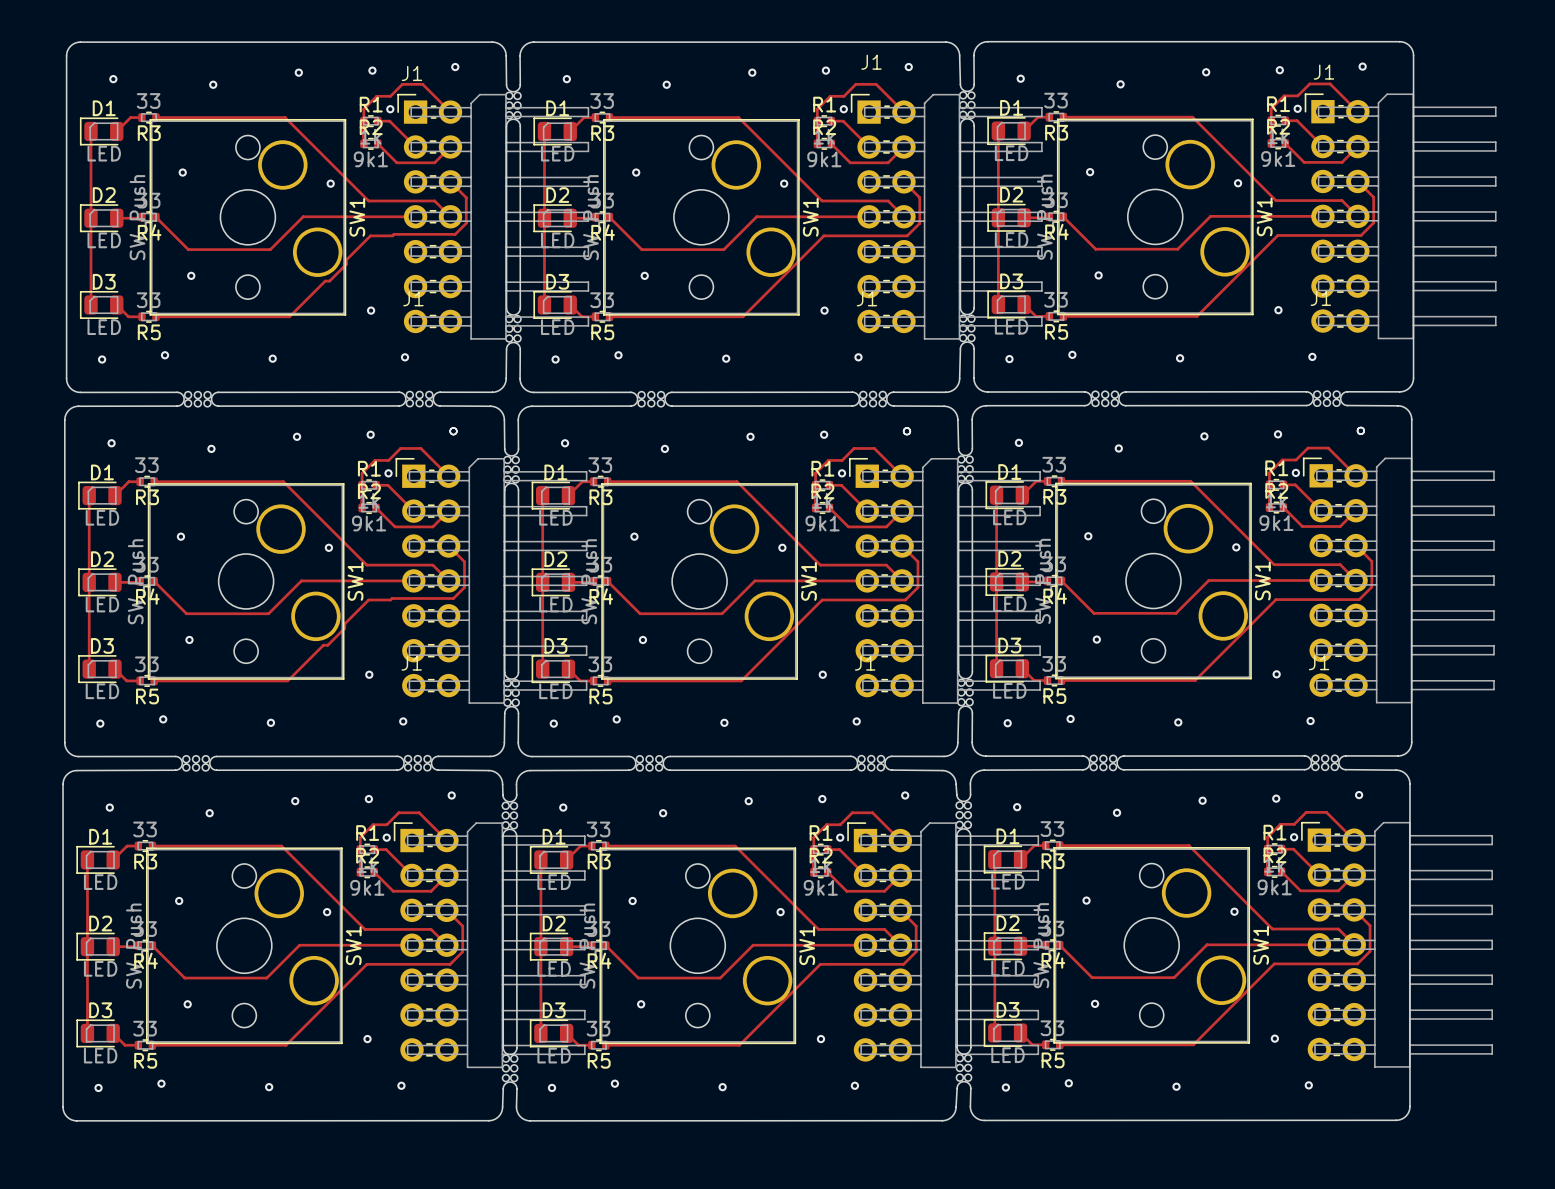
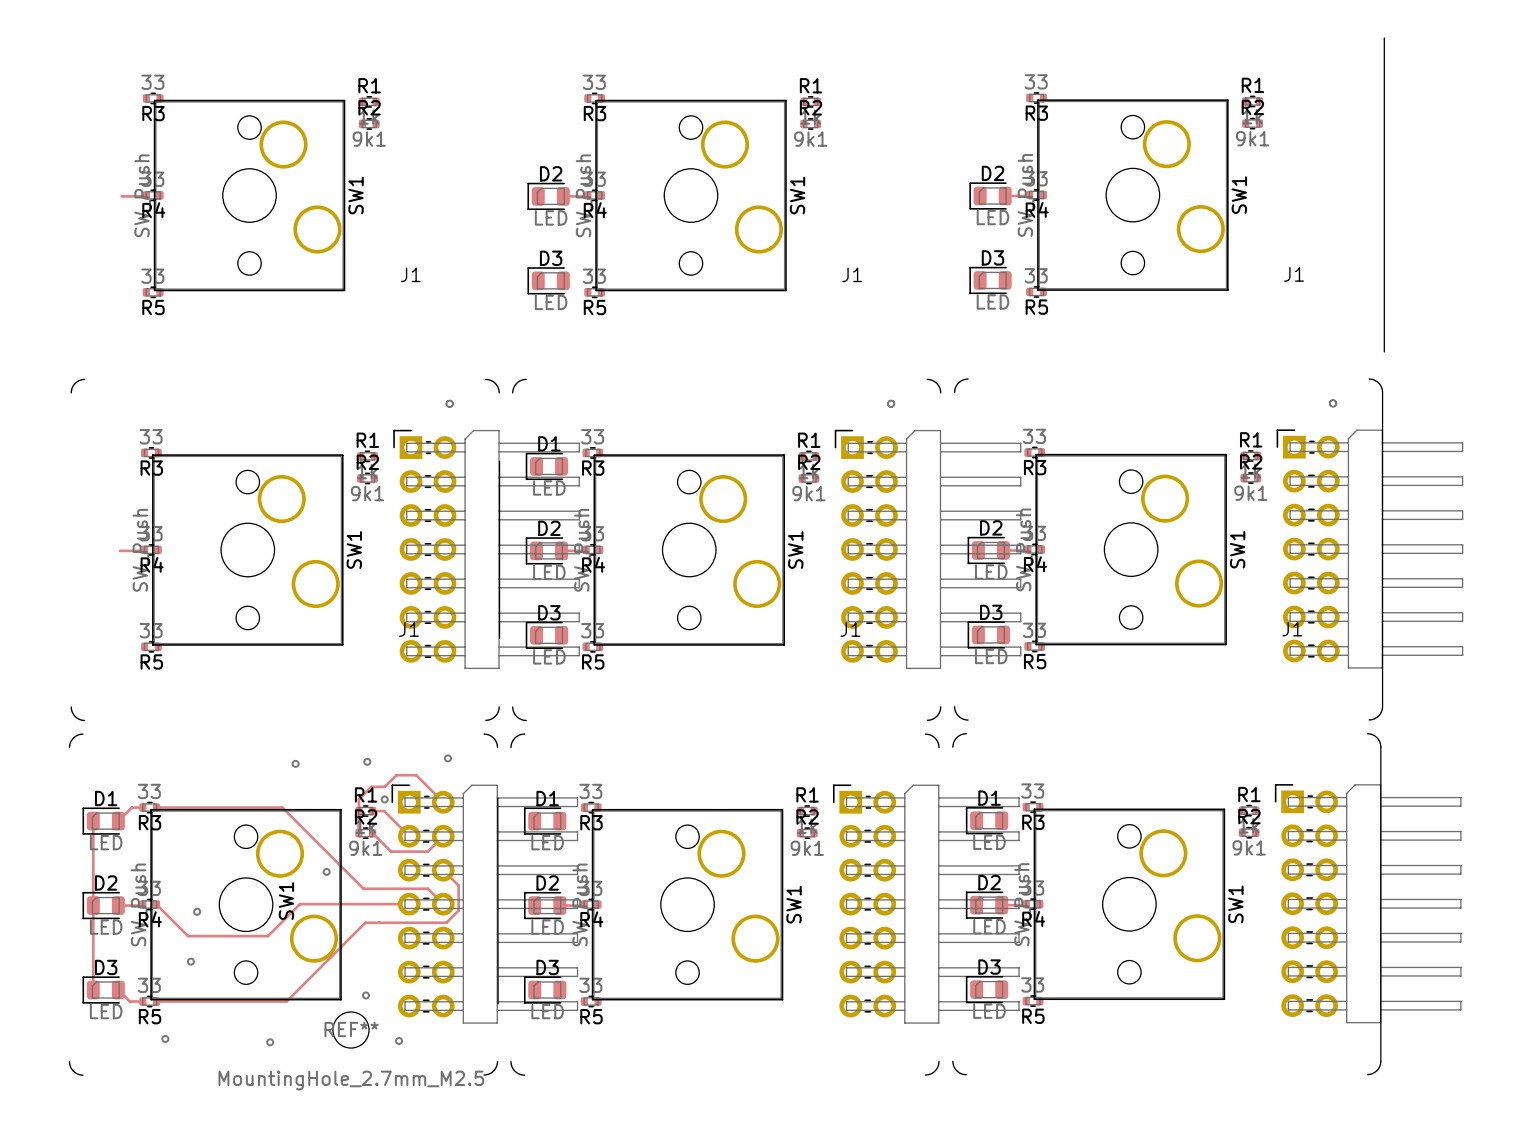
board edge: (987, 41) (1399, 41) -> none
board edge: (80, 42) (492, 42) -> none
board edge: (533, 42) (945, 42) -> none
board edge: (66, 55) (66, 378) -> none
board edge: (506, 55) (506, 84) -> none
board edge: (520, 55) (520, 84) -> none
board edge: (959, 55) (960, 84) -> none
board edge: (973, 55) (974, 84) -> none
via: (1362, 66) -> none
via: (455, 67) -> none
via: (908, 67) -> none
via: (372, 70) -> none
via: (825, 70) -> none
via: (1279, 70) -> none
via: (298, 72) -> none
via: (752, 72) -> none
via: (1206, 72) -> none
via: (1020, 78) -> none
via: (113, 79) -> none
via: (566, 79) -> none
via: (213, 84) -> none
via: (666, 84) -> none
via: (1120, 84) -> none
part: (513, 105) -> none
part: (967, 105) -> none
via: (1297, 108) -> none
via: (390, 109) -> none
via: (843, 109) -> none
track: (1357, 111) (1330, 83) (1309, 83) (1297, 95) (1284, 95) (1271, 108) (1271, 143) -> none
track: (450, 112) (422, 84) (402, 84) (390, 96) (376, 96) (363, 109) (363, 143) -> none
track: (903, 112) (876, 84) (855, 84) (843, 96) (830, 96) (817, 109) (817, 143) -> none
track: (141, 117) (130, 117) (116, 131) -> none
track: (155, 117) (285, 117) (368, 200) (434, 200) (450, 216) -> none
track: (595, 117) (584, 117) (570, 131) -> none
track: (609, 117) (738, 117) (822, 200) (888, 200) (903, 216) -> none
track: (1049, 117) (1038, 117) (1024, 131) -> none
track: (1063, 117) (1192, 117) (1275, 200) (1342, 200) (1357, 216) -> none
track: (1285, 120) (1297, 120) (1322, 146) -> none
track: (377, 121) (389, 121) (415, 146) -> none
track: (831, 121) (843, 121) (869, 146) -> none
board edge: (960, 125) (960, 307) -> none
board edge: (974, 125) (974, 307) -> none
board edge: (506, 126) (506, 308) -> none
board edge: (520, 126) (520, 308) -> none
track: (91, 131) (91, 304) -> none
D1: LED (101, 131) -> none
track: (544, 131) (544, 304) -> none
D1: LED (555, 131) -> none
track: (998, 131) (998, 304) -> none
D1: LED (1009, 131) -> none
track: (377, 143) (396, 162) (434, 162) (450, 146) -> none
track: (831, 143) (850, 162) (888, 162) (903, 146) -> none
track: (1285, 143) (1304, 162) (1342, 162) (1357, 146) -> none
via: (182, 172) -> none
via: (636, 172) -> none
via: (1090, 172) -> none
track: (450, 181) (466, 197) (466, 223) (455, 234) (370, 235) (346, 259) (346, 264) (329, 281) (325, 281) (289, 316) (155, 316) -> none
track: (903, 181) (919, 197) (919, 223) (907, 235) (823, 235) (743, 316) (609, 316) -> none
track: (1357, 181) (1373, 197) (1373, 222) (1361, 235) (1277, 235) (1196, 316) (1063, 316) -> none
via: (330, 183) -> none
via: (784, 183) -> none
via: (1238, 183) -> none
track: (415, 216) (303, 216) (270, 249) (188, 249) (155, 217) -> none
track: (869, 216) (756, 216) (723, 249) (641, 249) (609, 217) -> none
J1: (1234, 216) -> none
track: (1322, 216) (1210, 216) (1177, 249) (1095, 249) (1063, 216) -> none
J1: (327, 217) -> none
J1: (780, 217) -> none
D2: LED (101, 218) -> none
via: (191, 275) -> none
via: (644, 275) -> none
via: (1098, 275) -> none
D3: LED (101, 304) -> none
track: (116, 304) (128, 316) (141, 316) -> none
track: (570, 304) (582, 316) (595, 316) -> none
track: (1024, 304) (1035, 316) (1049, 316) -> none
via: (371, 310) -> none
via: (824, 310) -> none
via: (1278, 310) -> none
part: (513, 328) -> none
part: (967, 328) -> none
board edge: (960, 348) (959, 378) -> none
board edge: (974, 348) (973, 378) -> none
board edge: (506, 349) (506, 378) -> none
board edge: (520, 349) (520, 378) -> none
via: (1072, 354) -> none
via: (165, 355) -> none
via: (618, 355) -> none
via: (1312, 356) -> none
via: (405, 357) -> none
via: (858, 357) -> none
via: (272, 358) -> none
via: (726, 358) -> none
via: (1180, 358) -> none
via: (102, 359) -> none
via: (555, 359) -> none
via: (1009, 359) -> none
board edge: (1084, 391) (987, 392) -> none
board edge: (1306, 391) (1125, 391) -> none
board edge: (1347, 391) (1399, 391) -> none
board edge: (177, 392) (80, 392) -> none
board edge: (398, 392) (218, 392) -> none
board edge: (440, 392) (492, 392) -> none
board edge: (630, 392) (533, 392) -> none
board edge: (852, 392) (671, 392) -> none
board edge: (893, 392) (945, 392) -> none
part: (1105, 398) -> none
part: (1326, 398) -> none
part: (197, 399) -> none
part: (419, 399) -> none
part: (651, 399) -> none
part: (873, 399) -> none
board edge: (398, 405) (218, 406) -> none
board edge: (440, 405) (490, 406) -> none
board edge: (852, 405) (671, 406) -> none
board edge: (893, 405) (944, 406) -> none
board edge: (1084, 405) (986, 405) -> none
board edge: (1306, 405) (1125, 405) -> none
board edge: (1347, 405) (1397, 405) -> none
board edge: (177, 406) (78, 406) -> none
board edge: (630, 406) (532, 406) -> none
board edge: (972, 419) (972, 448) -> none
board edge: (64, 420) (64, 742) -> none
board edge: (504, 420) (504, 449) -> none
board edge: (518, 420) (518, 449) -> none
board edge: (957, 420) (958, 448) -> none
via: (370, 434) -> none
via: (824, 434) -> none
via: (1278, 434) -> none
via: (297, 436) -> none
via: (750, 436) -> none
via: (1204, 436) -> none
via: (1018, 442) -> none
via: (111, 443) -> none
via: (565, 443) -> none
via: (211, 448) -> none
via: (664, 448) -> none
via: (1118, 448) -> none
part: (511, 469) -> none
part: (965, 469) -> none
via: (1295, 472) -> none
via: (388, 473) -> none
via: (842, 473) -> none
track: (1356, 475) (1328, 448) (1307, 448) (1296, 460) (1282, 460) (1269, 472) (1269, 507) -> none
track: (448, 476) (420, 448) (400, 448) (388, 460) (374, 460) (362, 473) (362, 507) -> none
track: (902, 476) (874, 448) (854, 448) (842, 460) (828, 460) (815, 473) (815, 507) -> none
track: (140, 481) (128, 481) (114, 495) -> none
track: (154, 481) (283, 481) (366, 565) (432, 565) (448, 580) -> none
track: (593, 481) (582, 481) (568, 495) -> none
track: (607, 481) (736, 481) (820, 565) (886, 565) (902, 580) -> none
track: (1047, 481) (1036, 481) (1022, 495) -> none
track: (1061, 481) (1190, 481) (1274, 564) (1340, 564) (1356, 580) -> none
track: (1283, 484) (1295, 484) (1321, 510) -> none
track: (376, 485) (387, 485) (413, 511) -> none
track: (829, 485) (841, 485) (867, 511) -> none
board edge: (958, 489) (958, 671) -> none
board edge: (972, 489) (972, 671) -> none
board edge: (518, 490) (518, 672) -> none
track: (89, 495) (89, 669) -> none
D1: LED (99, 495) -> none
track: (542, 495) (542, 669) -> none
track: (996, 495) (996, 668) -> none
D1: LED (1007, 495) -> none
track: (376, 507) (395, 526) (432, 526) (448, 511) -> none
track: (829, 507) (848, 526) (886, 526) (902, 511) -> none
track: (1283, 507) (1302, 526) (1340, 526) (1356, 510) -> none
via: (180, 536) -> none
via: (634, 536) -> none
via: (1088, 536) -> none
track: (1356, 545) (1371, 561) (1371, 587) (1359, 599) (1276, 599) (1195, 680) (1061, 680) -> none
track: (448, 546) (464, 561) (464, 587) (453, 598) (368, 600) (344, 623) (344, 628) (327, 645) (323, 645) (287, 680) (154, 680) -> none
track: (902, 546) (917, 561) (917, 587) (905, 600) (822, 600) (741, 680) (607, 680) -> none
via: (328, 547) -> none
via: (782, 547) -> none
via: (1236, 547) -> none
track: (413, 580) (301, 580) (268, 613) (186, 613) (154, 581) -> none
track: (867, 580) (754, 580) (722, 613) (640, 613) (607, 581) -> none
track: (1321, 580) (1208, 580) (1175, 613) (1093, 613) (1061, 580) -> none
D2: LED (99, 582) -> none
via: (189, 639) -> none
via: (642, 639) -> none
via: (1096, 639) -> none
track: (1022, 668) (1034, 680) (1047, 680) -> none
D3: LED (99, 669) -> none
track: (114, 669) (126, 680) (140, 680) -> none
track: (568, 669) (580, 680) (593, 680) -> none
via: (369, 674) -> none
via: (822, 674) -> none
via: (1276, 674) -> none
part: (511, 692) -> none
part: (965, 692) -> none
board edge: (504, 713) (504, 742) -> none
board edge: (518, 713) (518, 742) -> none
board edge: (958, 713) (957, 742) -> none
board edge: (972, 713) (972, 742) -> none
via: (1070, 718) -> none
via: (163, 719) -> none
via: (616, 719) -> none
via: (403, 721) -> none
via: (856, 721) -> none
via: (1310, 721) -> none
via: (270, 722) -> none
via: (724, 722) -> none
via: (1178, 722) -> none
via: (100, 723) -> none
via: (553, 723) -> none
via: (1007, 723) -> none
board edge: (1304, 755) (1124, 756) -> none
board edge: (1345, 755) (1397, 755) -> none
board edge: (78, 756) (175, 756) -> none
board edge: (397, 756) (216, 756) -> none
board edge: (438, 756) (490, 756) -> none
board edge: (532, 756) (628, 756) -> none
board edge: (850, 756) (670, 756) -> none
board edge: (891, 756) (944, 756) -> none
board edge: (985, 756) (1082, 756) -> none
part: (1103, 762) -> none
part: (1325, 762) -> none
part: (196, 763) -> none
part: (417, 763) -> none
part: (649, 763) -> none
part: (871, 763) -> none
board edge: (1082, 769) (984, 770) -> none
board edge: (1304, 769) (1124, 769) -> none
board edge: (1345, 769) (1396, 770) -> none
board edge: (175, 770) (76, 770) -> none
board edge: (397, 770) (216, 770) -> none
board edge: (438, 770) (488, 770) -> none
board edge: (628, 770) (530, 770) -> none
board edge: (850, 770) (670, 770) -> none
board edge: (891, 770) (942, 770) -> none
board edge: (970, 783) (970, 794) -> none
board edge: (63, 784) (63, 1107) -> none
board edge: (502, 784) (502, 794) -> none
board edge: (516, 784) (516, 794) -> none
board edge: (956, 784) (956, 794) -> none
via: (905, 795) -> none
via: (1359, 795) -> none
via: (1276, 798) -> none
via: (822, 799) -> none
via: (1202, 800) -> none
via: (748, 801) -> none
via: (109, 807) -> none
via: (563, 807) -> none
via: (1017, 807) -> none
via: (1117, 812) -> none
via: (209, 813) -> none
via: (663, 813) -> none
part: (509, 815) -> none
part: (963, 815) -> none
board edge: (956, 835) (957, 1047) -> none
board edge: (970, 835) (970, 1047) -> none
board edge: (516, 836) (516, 1047) -> none
via: (840, 837) -> none
via: (1294, 837) -> none
track: (900, 840) (872, 812) (852, 812) (840, 824) (826, 824) (813, 837) (813, 872) -> none
track: (1354, 840) (1326, 812) (1306, 812) (1294, 824) (1280, 824) (1267, 837) (1267, 871) -> none
track: (1045, 845) (1034, 845) (1020, 859) -> none
track: (1059, 845) (1189, 845) (1272, 929) (1338, 929) (1354, 944) -> none
track: (591, 846) (580, 846) (566, 859) -> none
track: (605, 846) (735, 846) (818, 929) (884, 929) (900, 945) -> none
track: (827, 849) (839, 849) (865, 875) -> none
track: (1281, 849) (1293, 849) (1319, 875) -> none
track: (540, 859) (540, 1033) -> none
track: (994, 859) (994, 1033) -> none
track: (1281, 871) (1300, 890) (1338, 890) (1354, 875) -> none
track: (827, 872) (846, 891) (884, 891) (900, 875) -> none
via: (1086, 900) -> none
via position: (179, 901) -> (197, 911)
via: (632, 901) -> none
track: (1354, 909) (1370, 925) (1370, 951) (1357, 963) (1274, 963) (1193, 1044) (1059, 1044) -> none
track: (900, 910) (916, 926) (916, 951) (903, 964) (820, 964) (739, 1045) (605, 1045) -> none
via: (1234, 911) -> none
via: (780, 912) -> none
track: (1319, 944) (1207, 944) (1174, 977) (1092, 977) (1059, 945) -> none
SW1 name position: SW1 (353, 945) -> SW1 (286, 901)
track: (865, 945) (753, 945) (720, 978) (638, 978) (605, 945) -> none
via: (1095, 1003) -> none
via: (641, 1004) -> none
track: (566, 1033) (578, 1045) (591, 1045) -> none
track: (1020, 1033) (1032, 1044) (1045, 1044) -> none
via: (1274, 1038) -> none
via: (820, 1039) -> none
part: (963, 1067) -> none
part: (510, 1068) -> none
REF**: none -> MountingHole_2.7mm_M2.5 (350, 1030)
via: (614, 1083) -> none
via: (1068, 1083) -> none
via: (854, 1085) -> none
via: (1308, 1085) -> none
via: (1176, 1086) -> none
via: (98, 1087) -> none
via: (552, 1087) -> none
via: (722, 1087) -> none
via: (1005, 1087) -> none
board edge: (503, 1088) (502, 1106) -> none
board edge: (516, 1088) (516, 1107) -> none
board edge: (957, 1088) (956, 1106) -> none
board edge: (970, 1088) (970, 1106) -> none
board edge: (488, 1120) (76, 1120) -> none
board edge: (942, 1120) (530, 1120) -> none
board edge: (1396, 1120) (984, 1120) -> none

